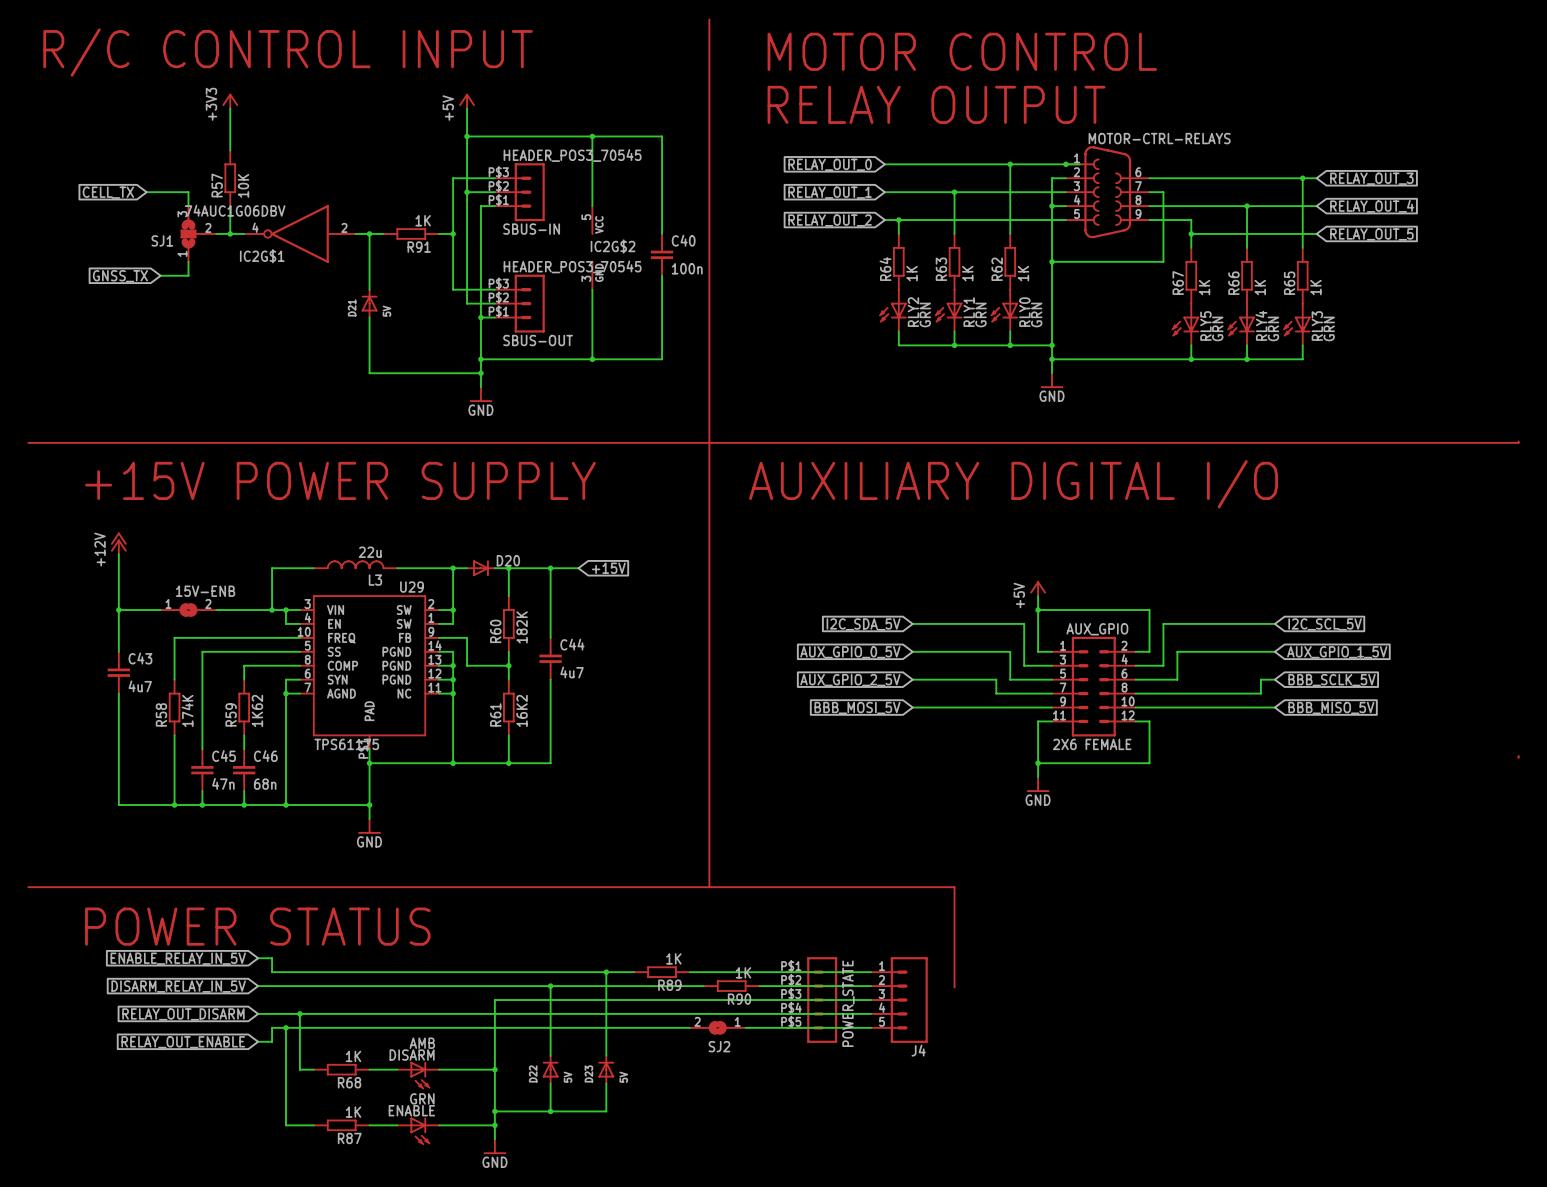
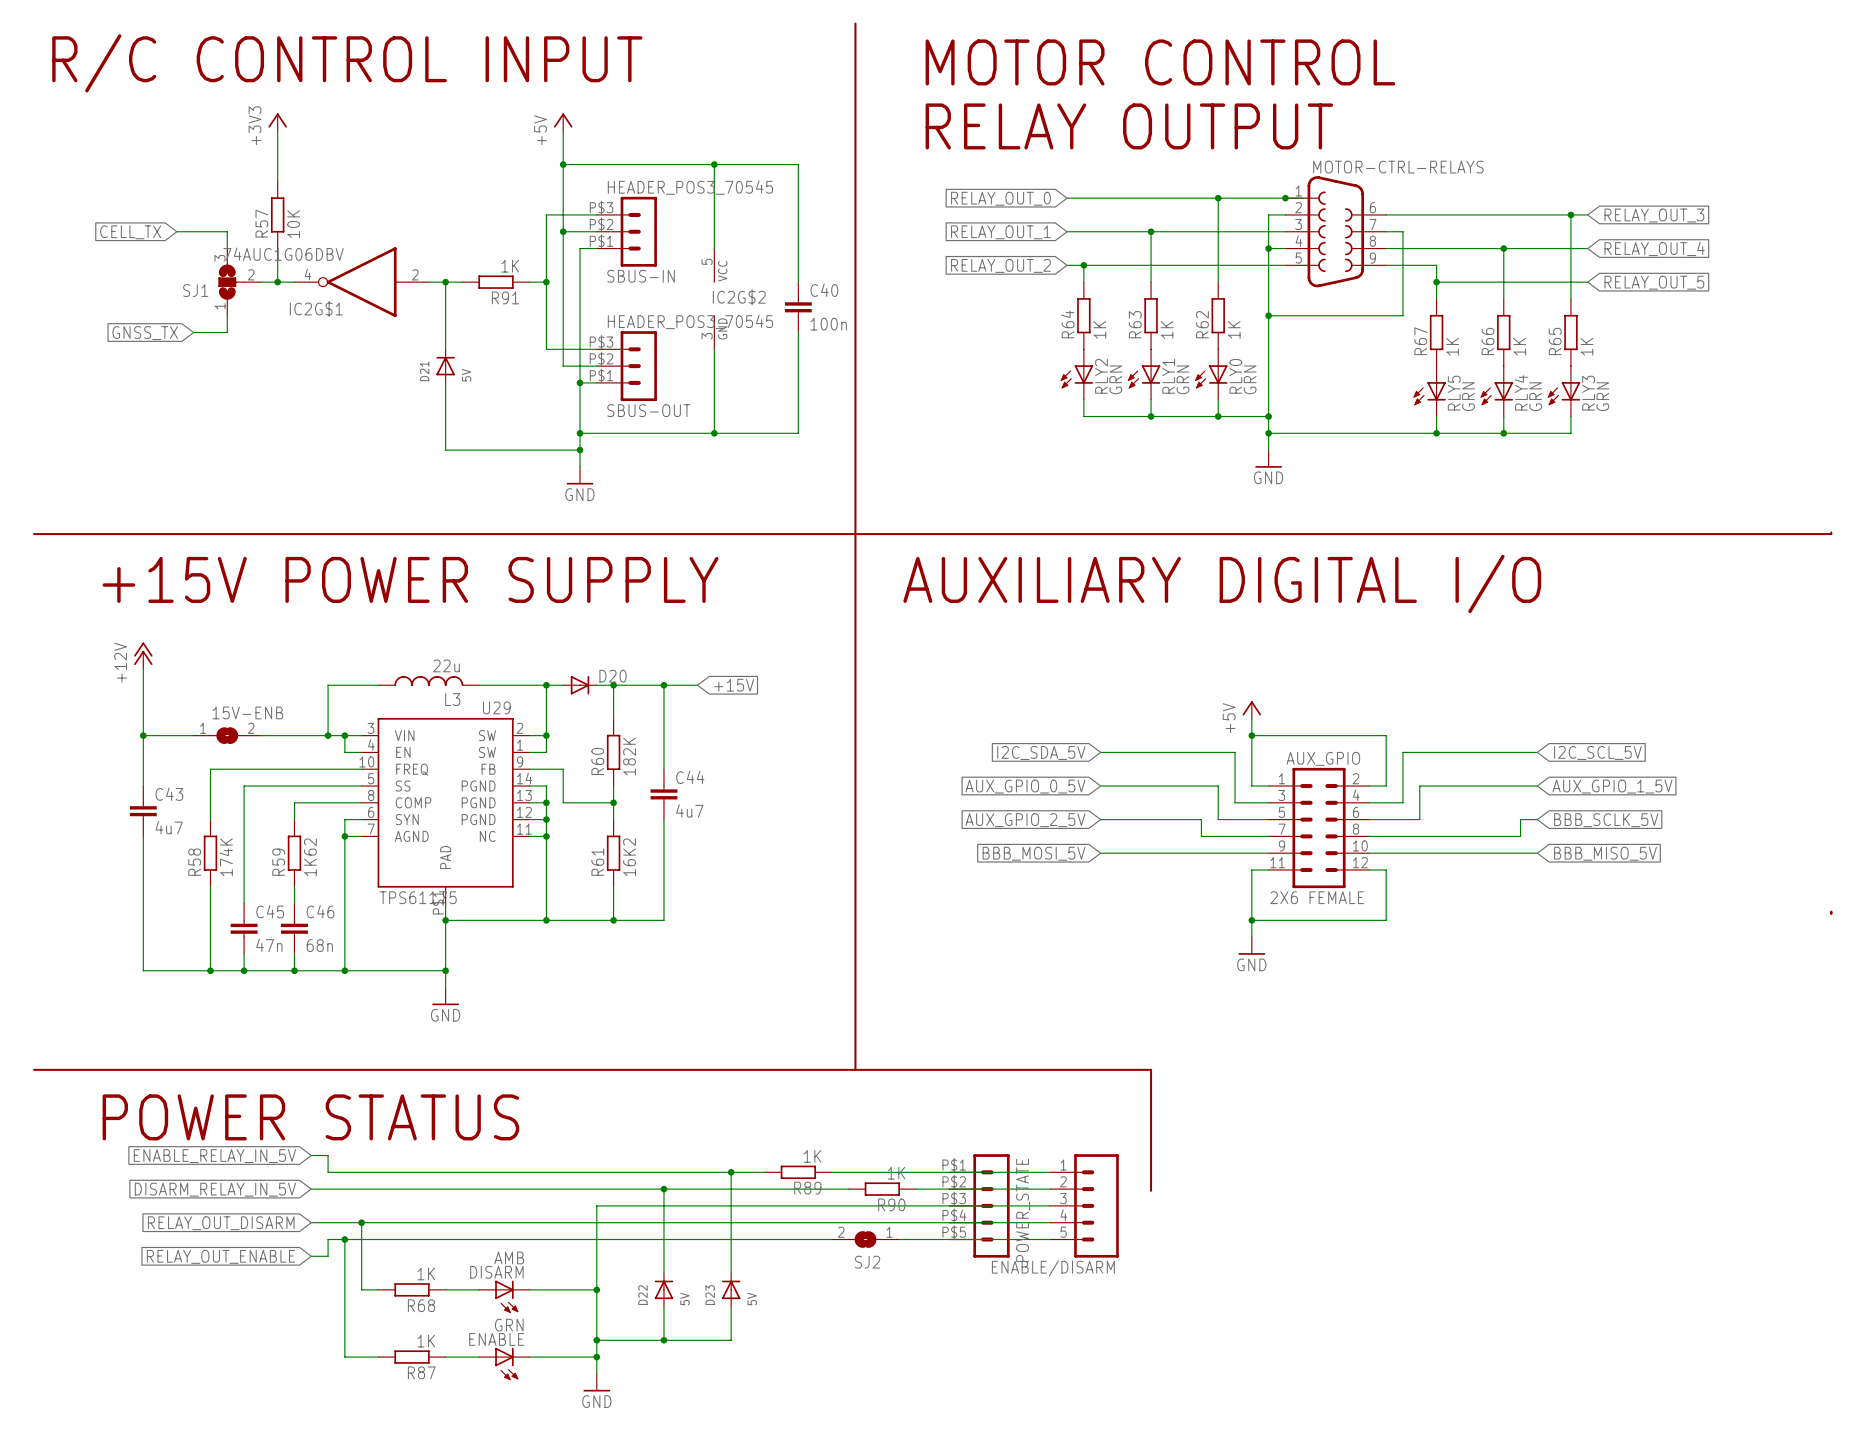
J4 name: J4 (918, 1050) -> ENABLE/DISARM (1053, 1268)

